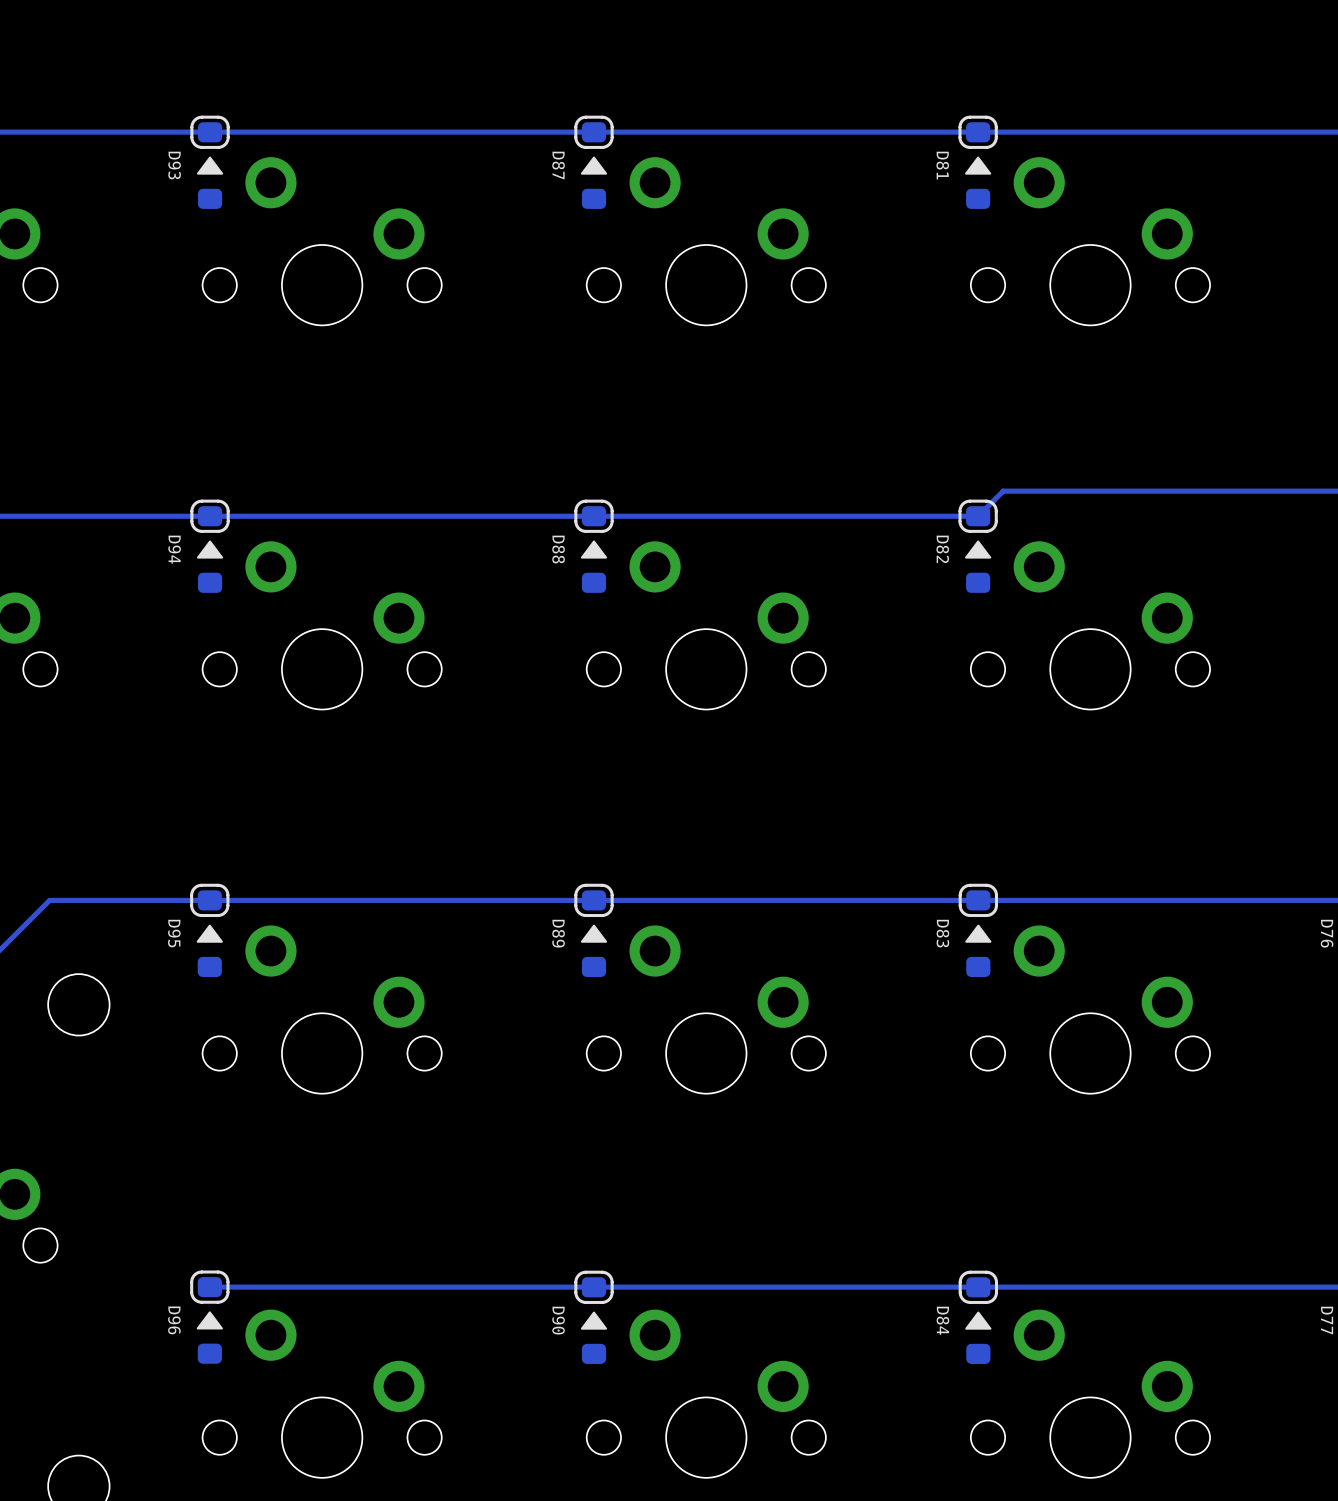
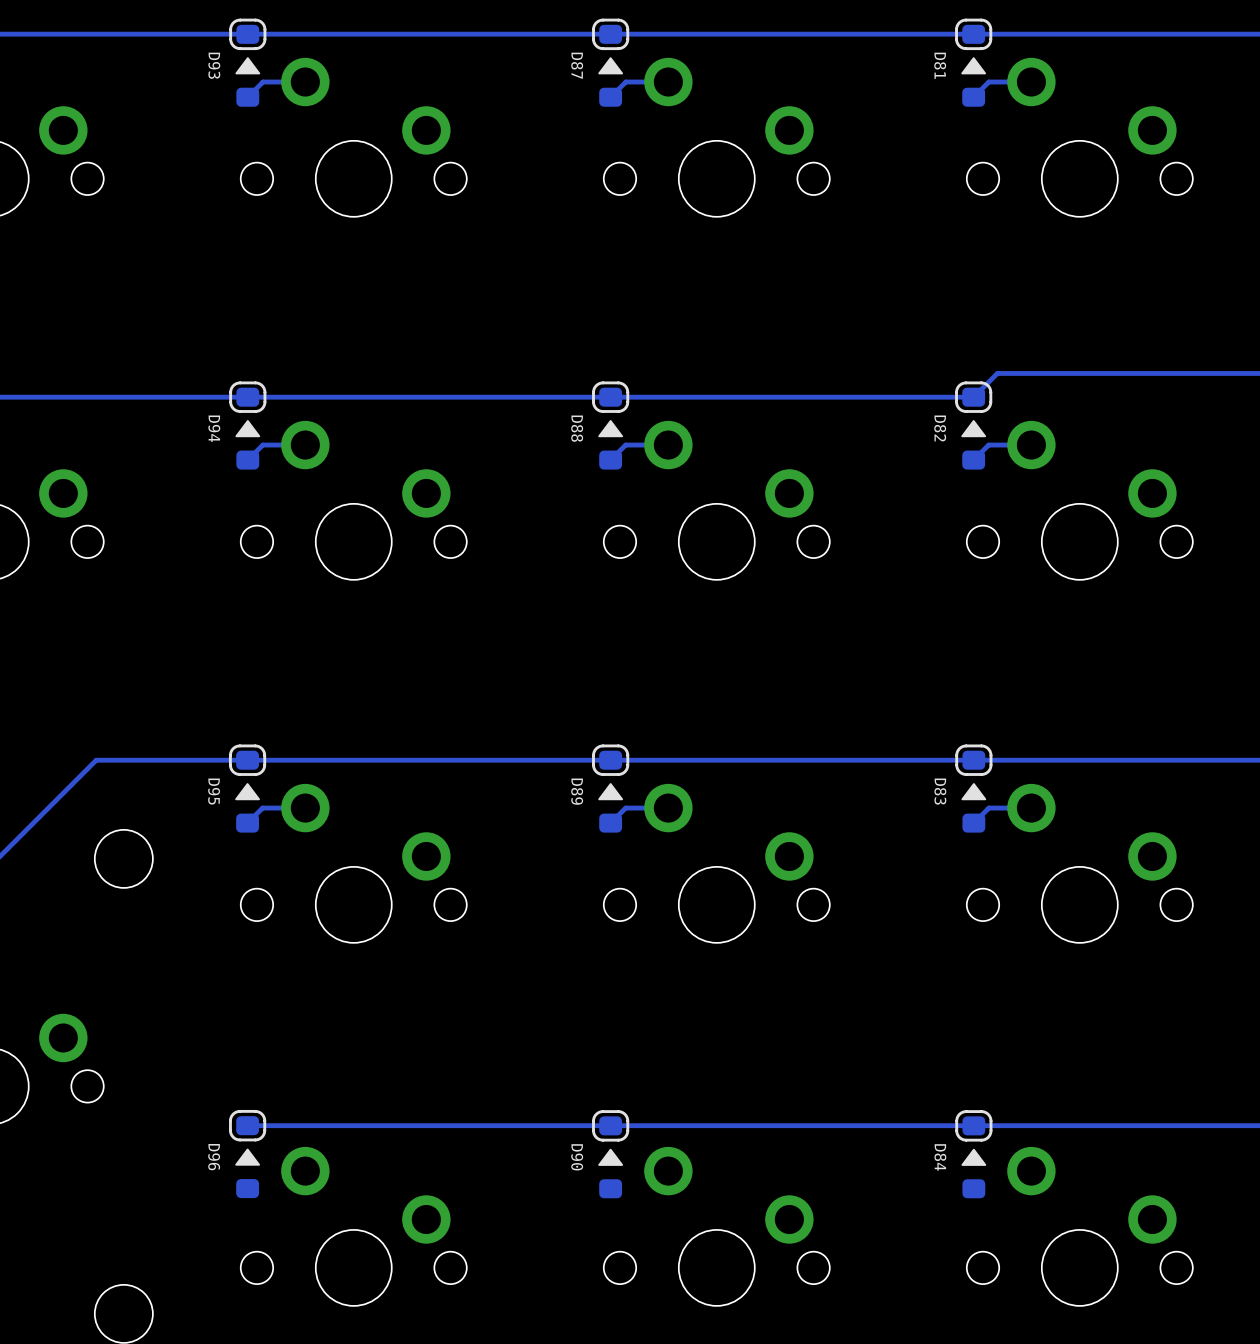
track: none -> (305, 82) (263, 82) (247, 97)
track: none -> (668, 82) (625, 82) (610, 97)
track: none -> (1031, 82) (988, 82) (973, 97)
track: none -> (305, 445) (262, 445) (247, 460)
track: none -> (668, 445) (625, 445) (610, 460)
track: none -> (1031, 445) (988, 445) (973, 460)
track: none -> (305, 808) (262, 808) (247, 823)
track: none -> (668, 808) (625, 808) (610, 823)
track: none -> (1031, 808) (988, 808) (973, 823)

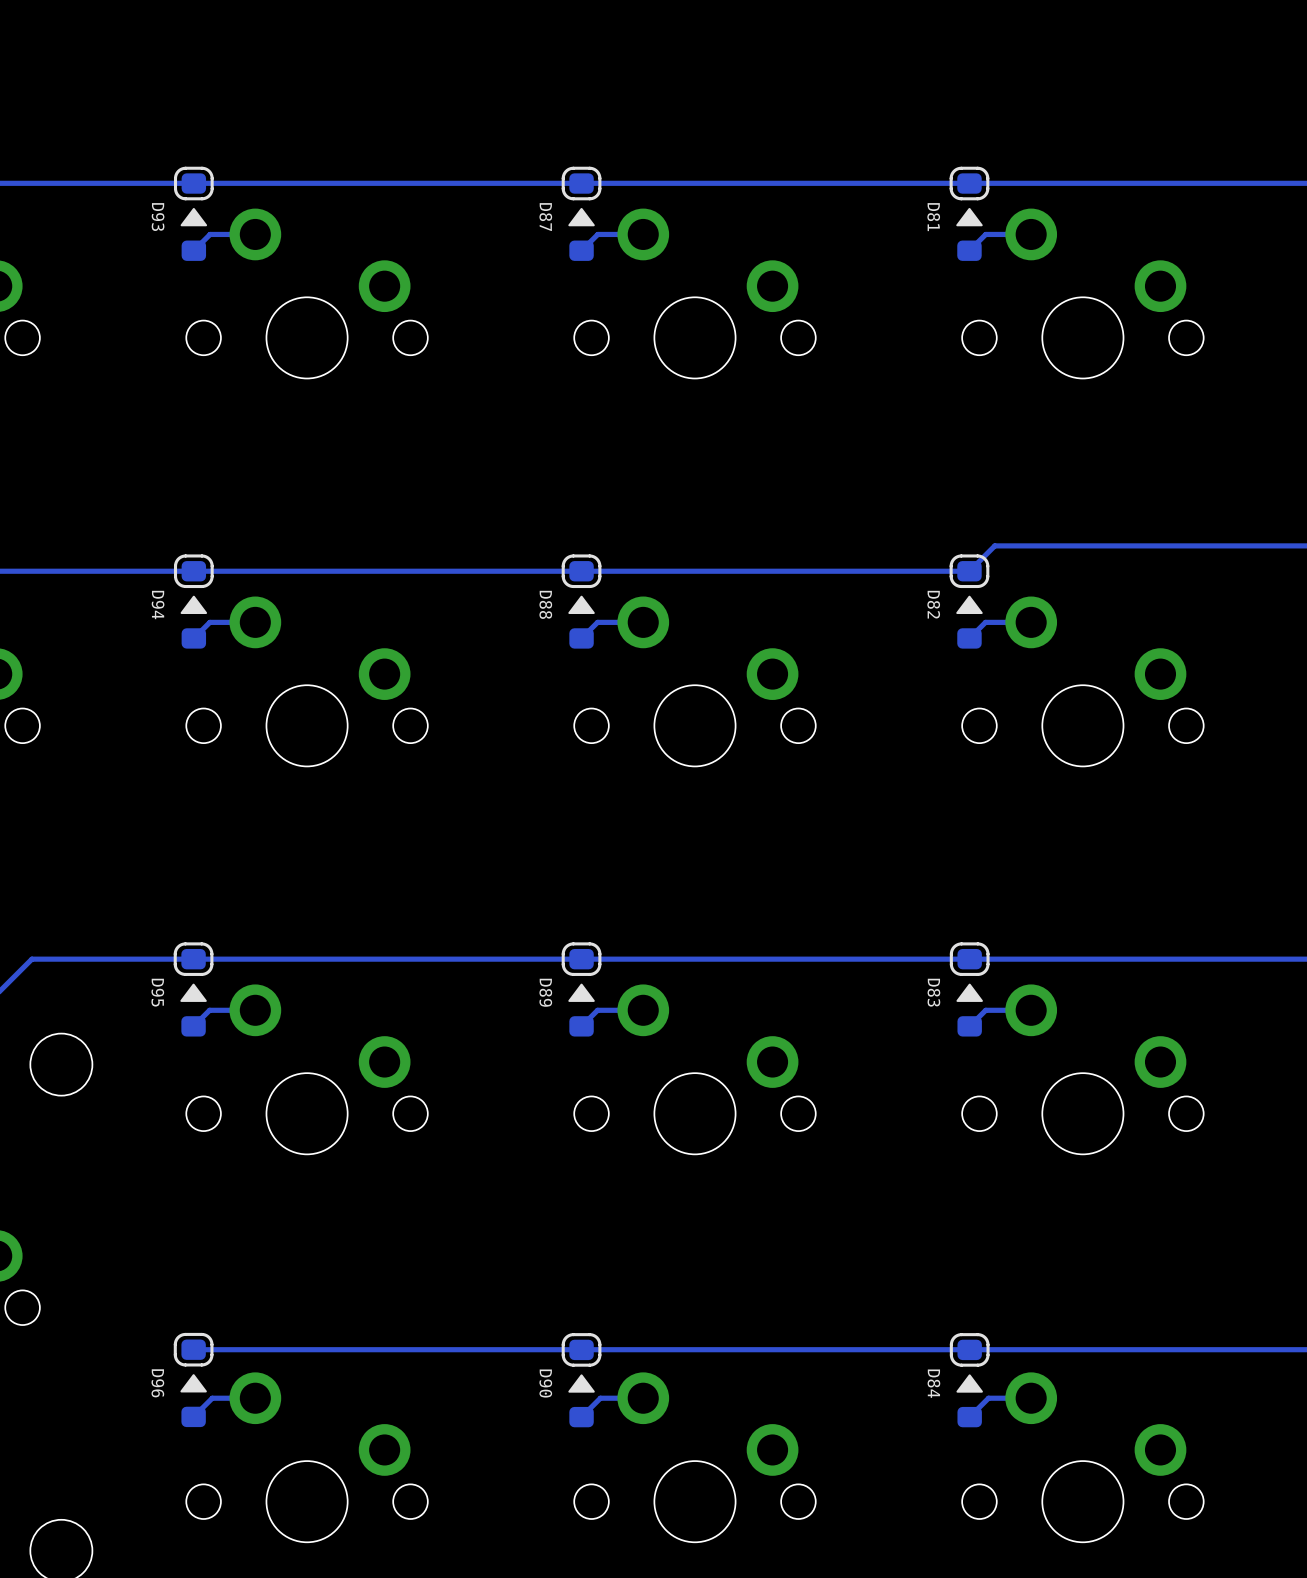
track: none -> (255, 1398) (212, 1398) (193, 1416)
track: none -> (643, 1398) (600, 1398) (581, 1417)
track: none -> (1031, 1398) (988, 1398) (969, 1417)

